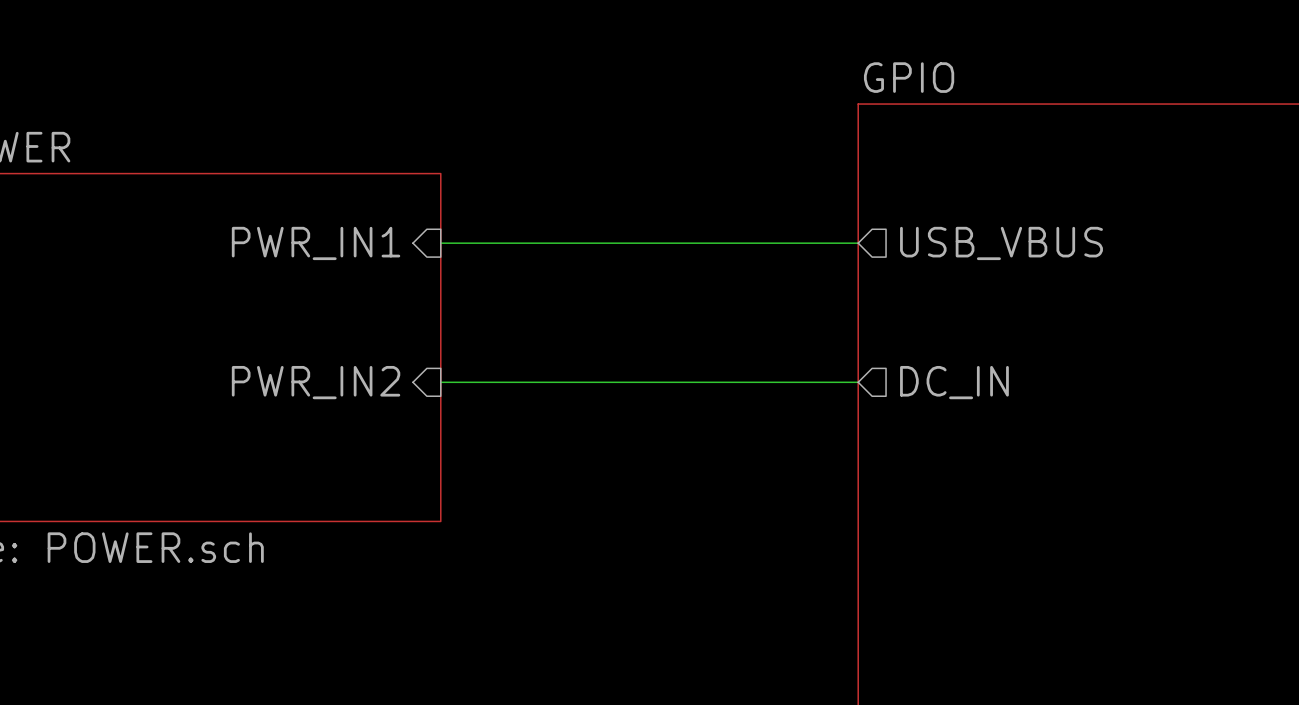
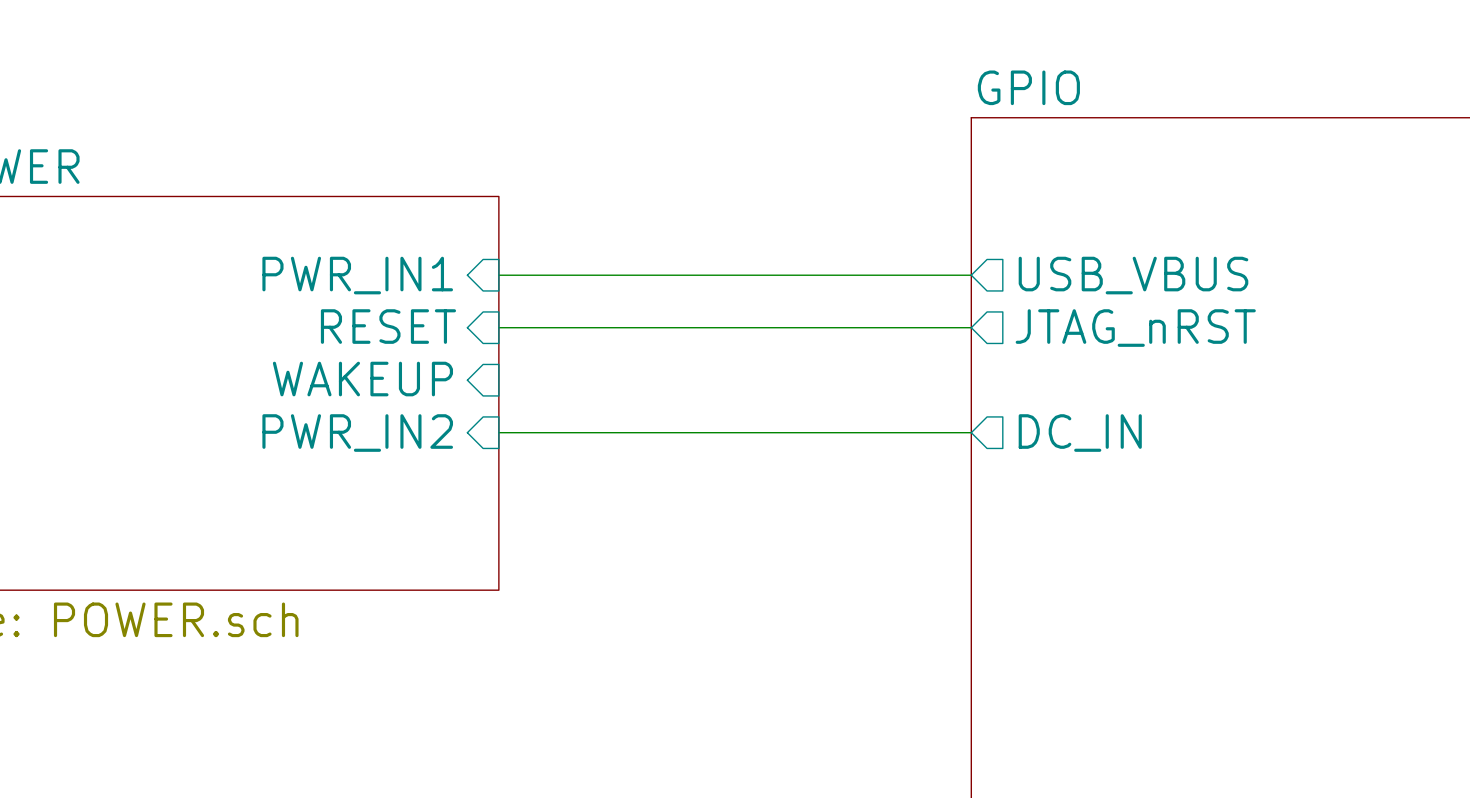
sheet pin: none -> RESET (388, 326)
wire: none -> (498, 327) (971, 327)
sheet pin: none -> JTAG_nRST (1135, 328)
sheet pin: none -> WAKEUP (362, 379)

